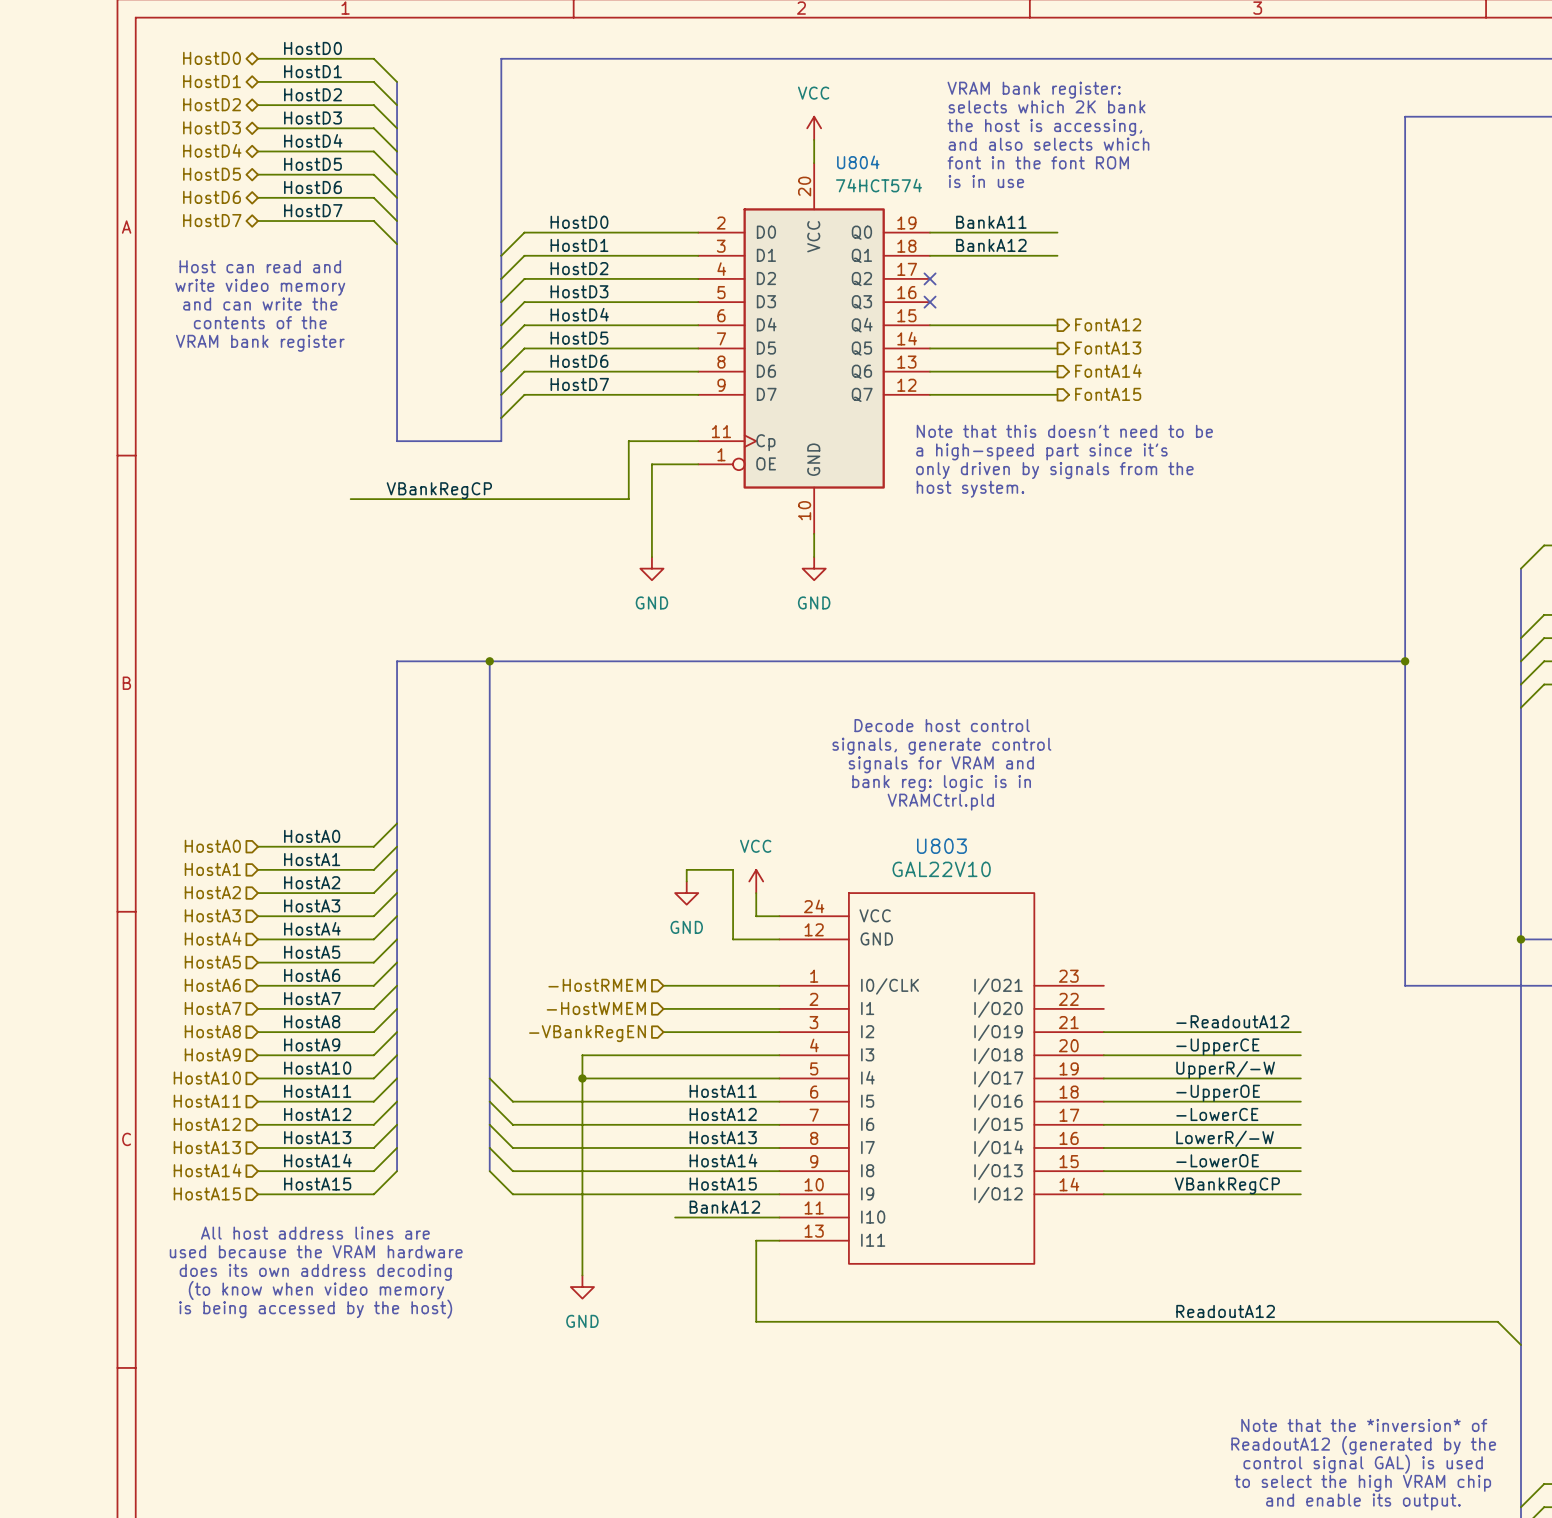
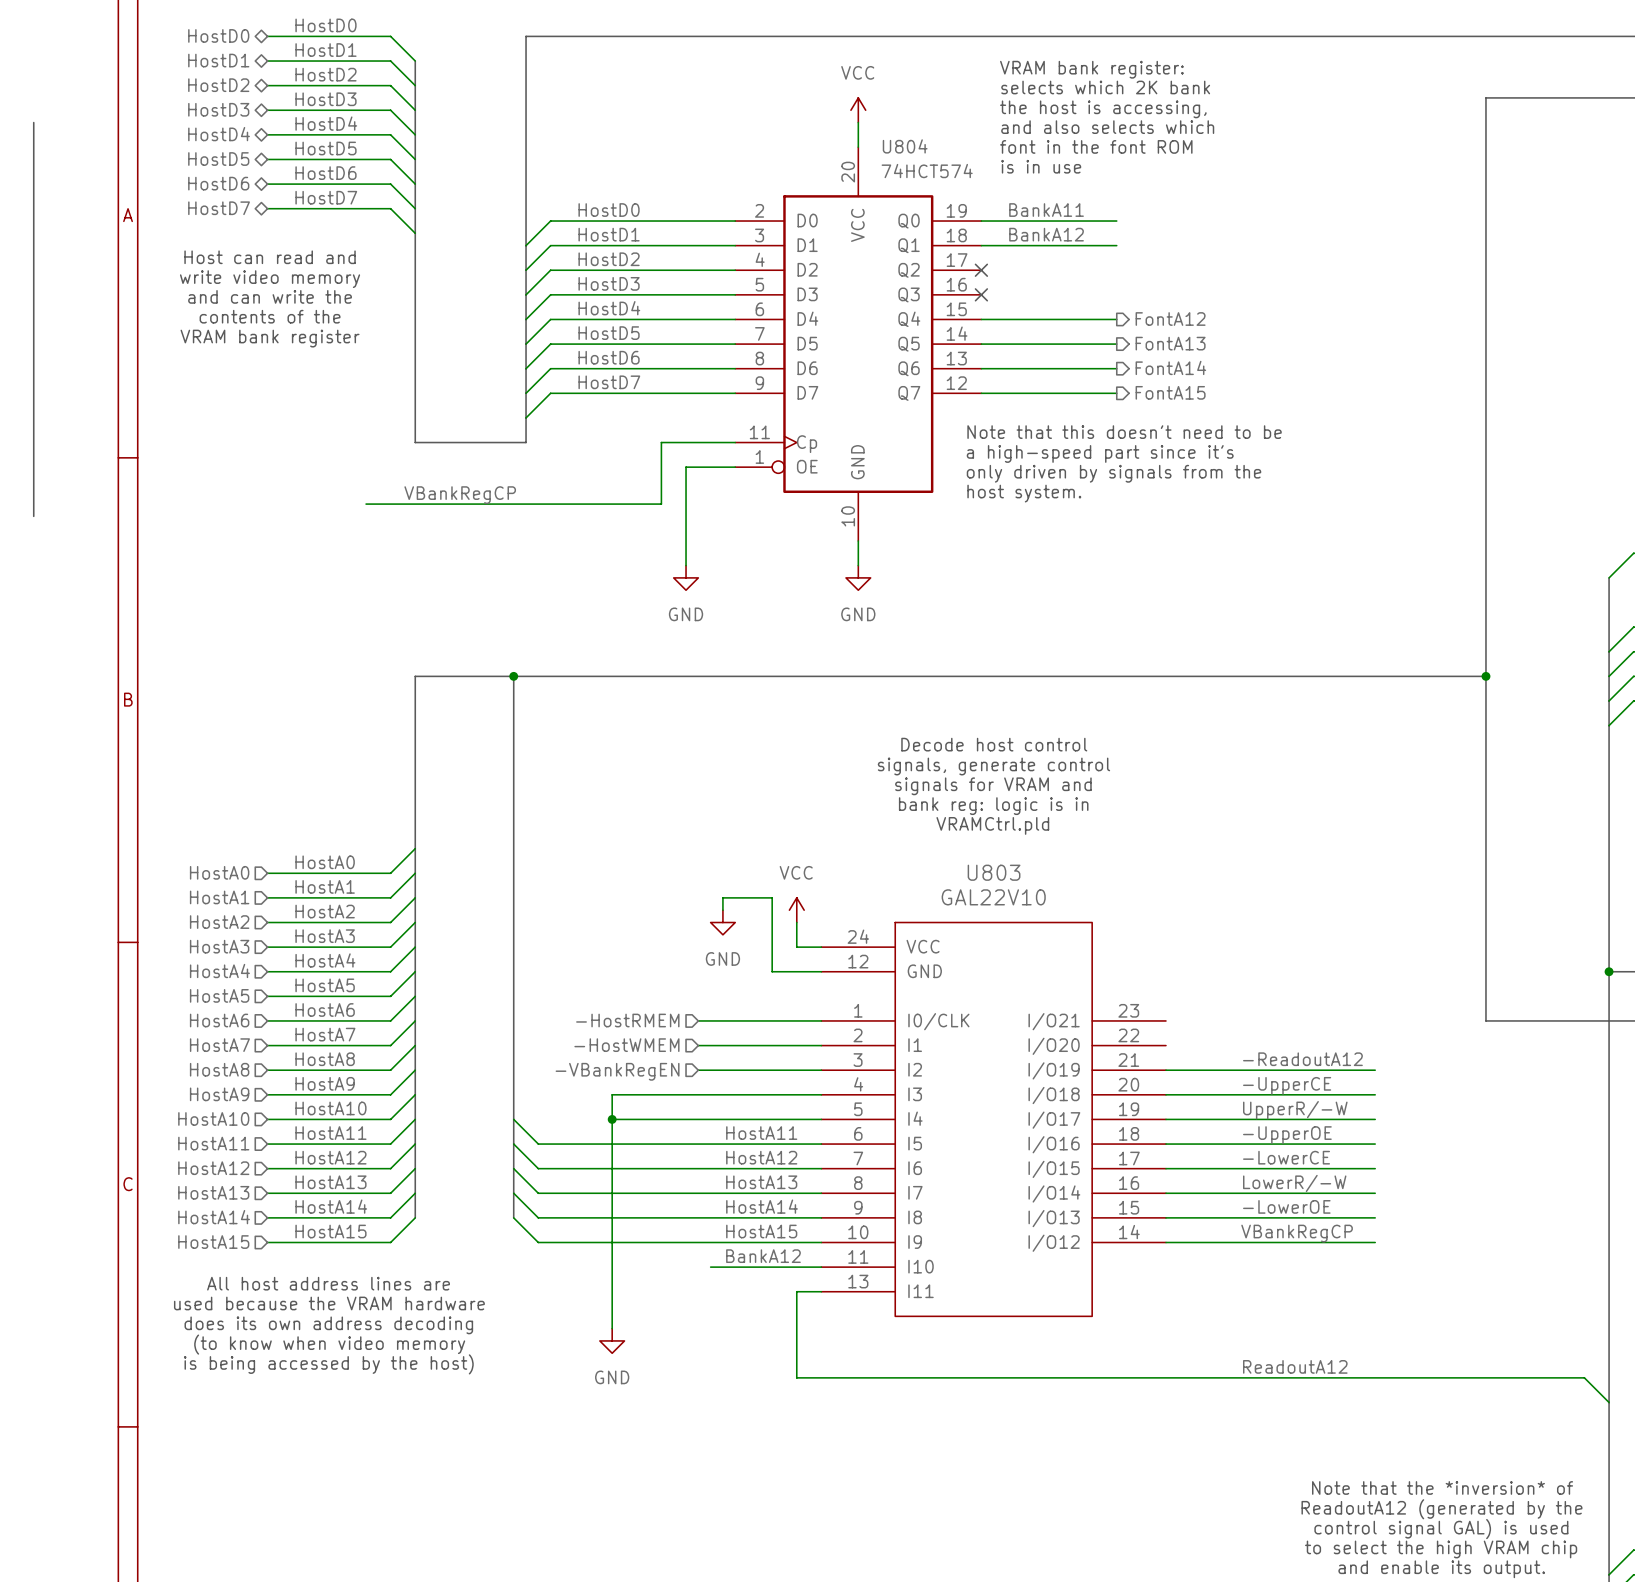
bus: none -> (33, 122) (33, 516)

